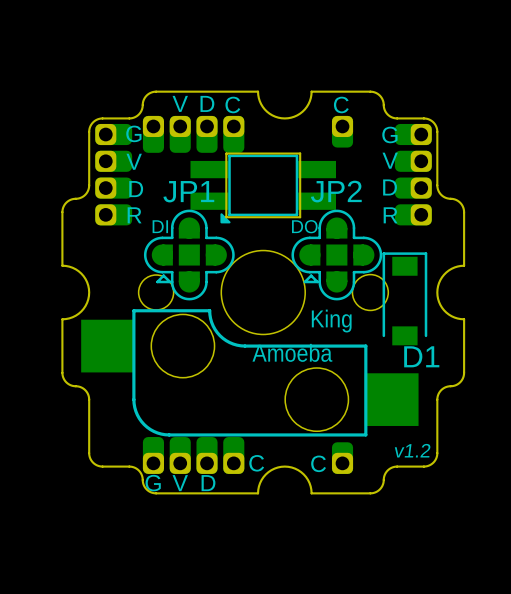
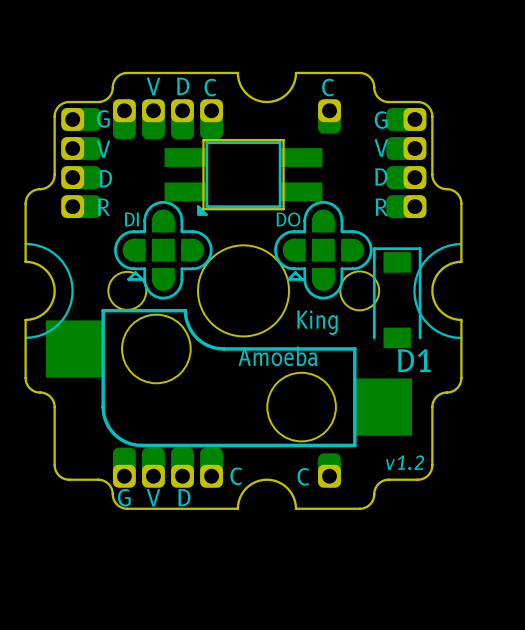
JP1 name: JP1 (188, 191) -> none
JP2 name: JP2 (336, 191) -> none
line: none -> (25, 243) (43, 247) (58, 257) (68, 272) (72, 290) (69, 308) (59, 323) (43, 334) (25, 337)
line: none -> (461, 244) (443, 247) (428, 257) (417, 273) (414, 291) (418, 309) (428, 324) (443, 334) (461, 338)

